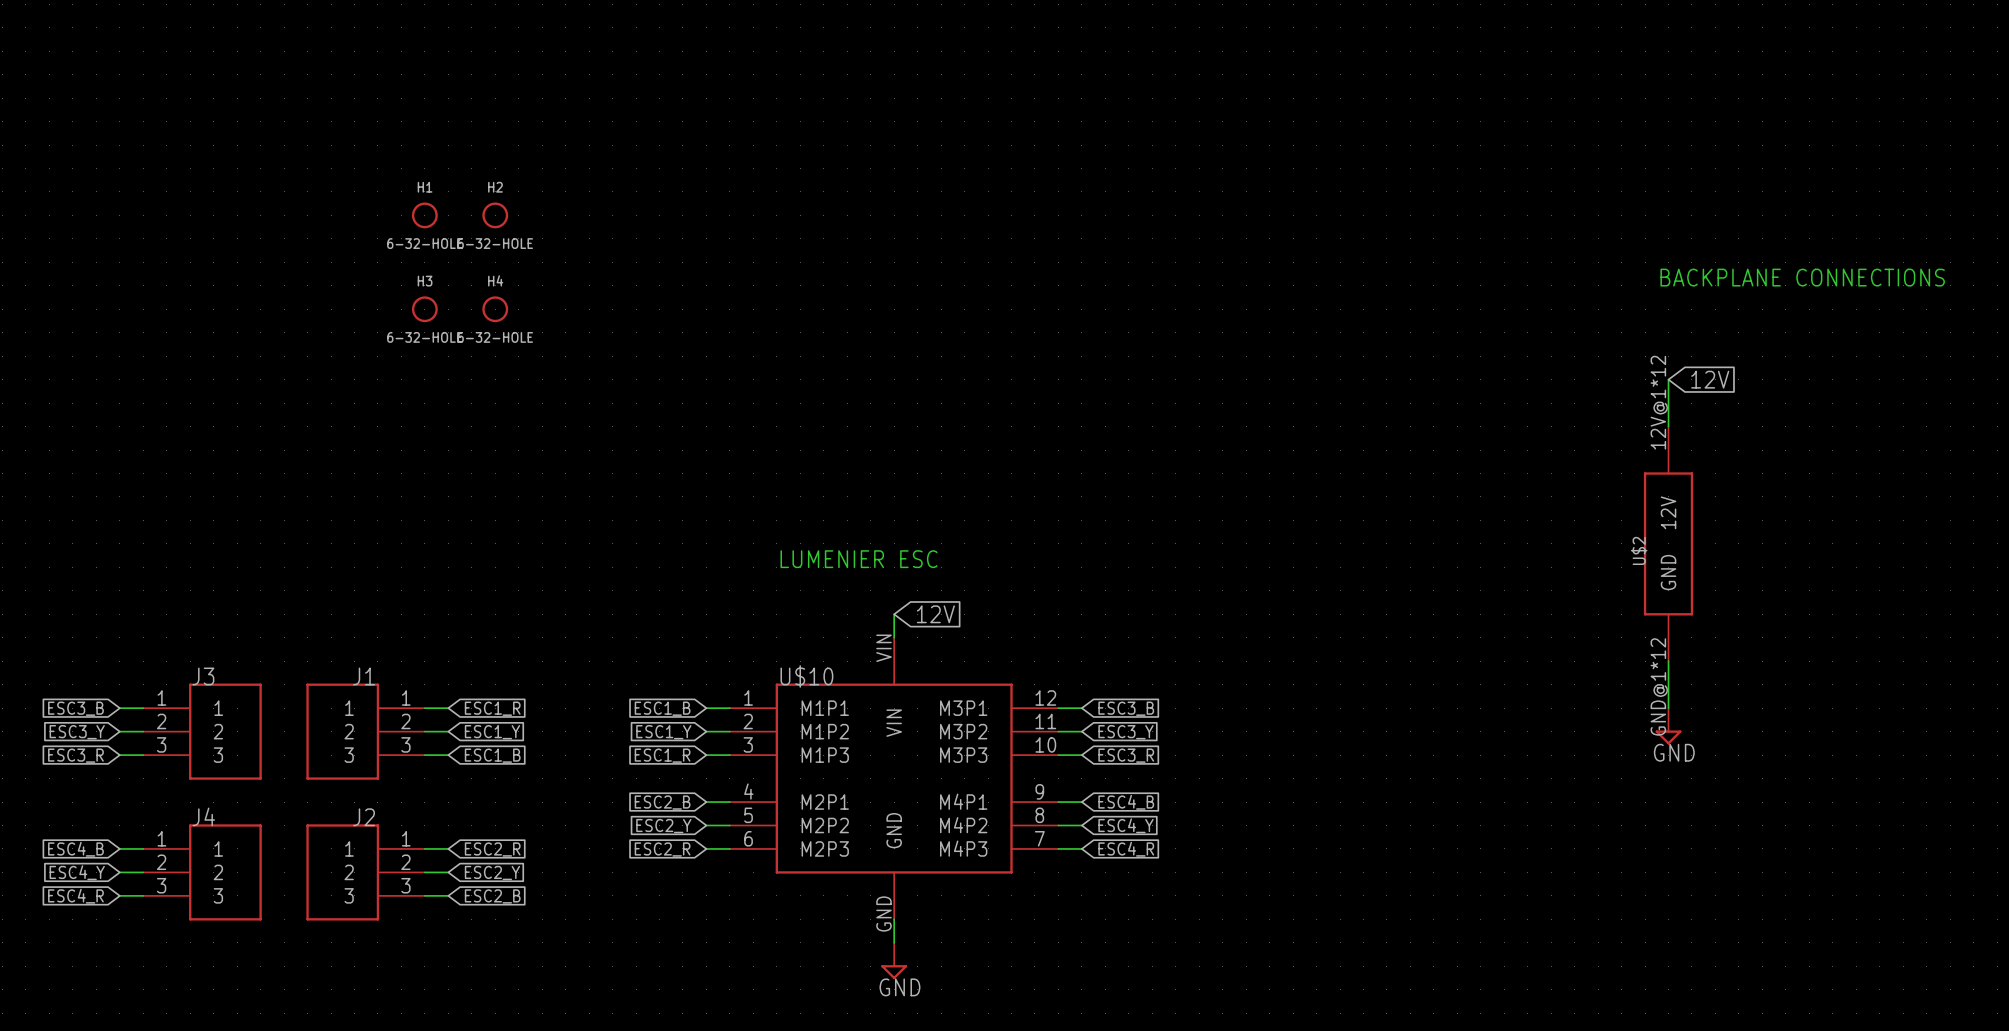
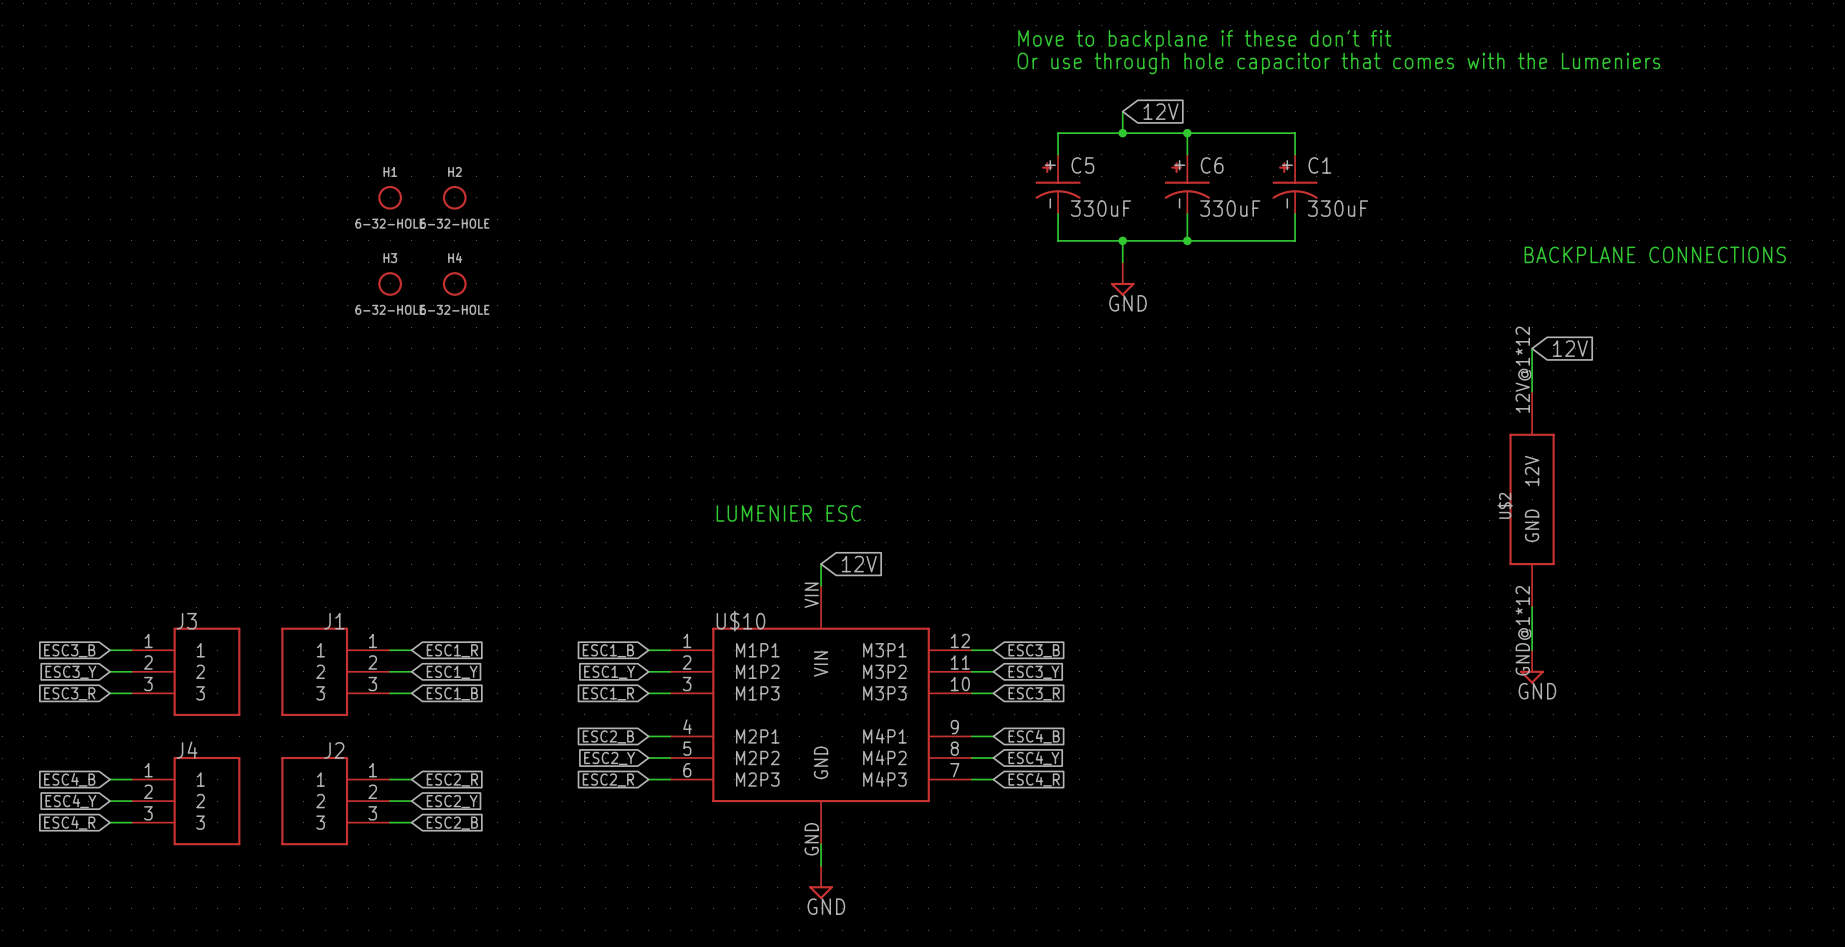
text: none -> Move to backplane if these don't fit (1204, 40)
text: none -> Or use through hole capacitor that comes with the Lumeniers (1338, 63)
wire: none -> (1122, 111) (1122, 133)
global label: none -> 12V (1160, 111)
junction: none -> (1122, 133)
wire: none -> (1187, 133) (1187, 154)
junction: none -> (1187, 133)
wire: none -> (1058, 154) (1058, 133) (1295, 133) (1295, 154)
C5: none -> 330uF (1058, 184)
C6: none -> 330uF (1187, 184)
C1: none -> 330uF (1295, 184)
wire: none -> (1058, 213) (1058, 240) (1295, 240) (1295, 213)
wire: none -> (1187, 213) (1187, 240)
wire: none -> (1122, 240) (1122, 262)
junction: none -> (1122, 240)
junction: none -> (1187, 240)
power symbol: none -> GND (1122, 279)

